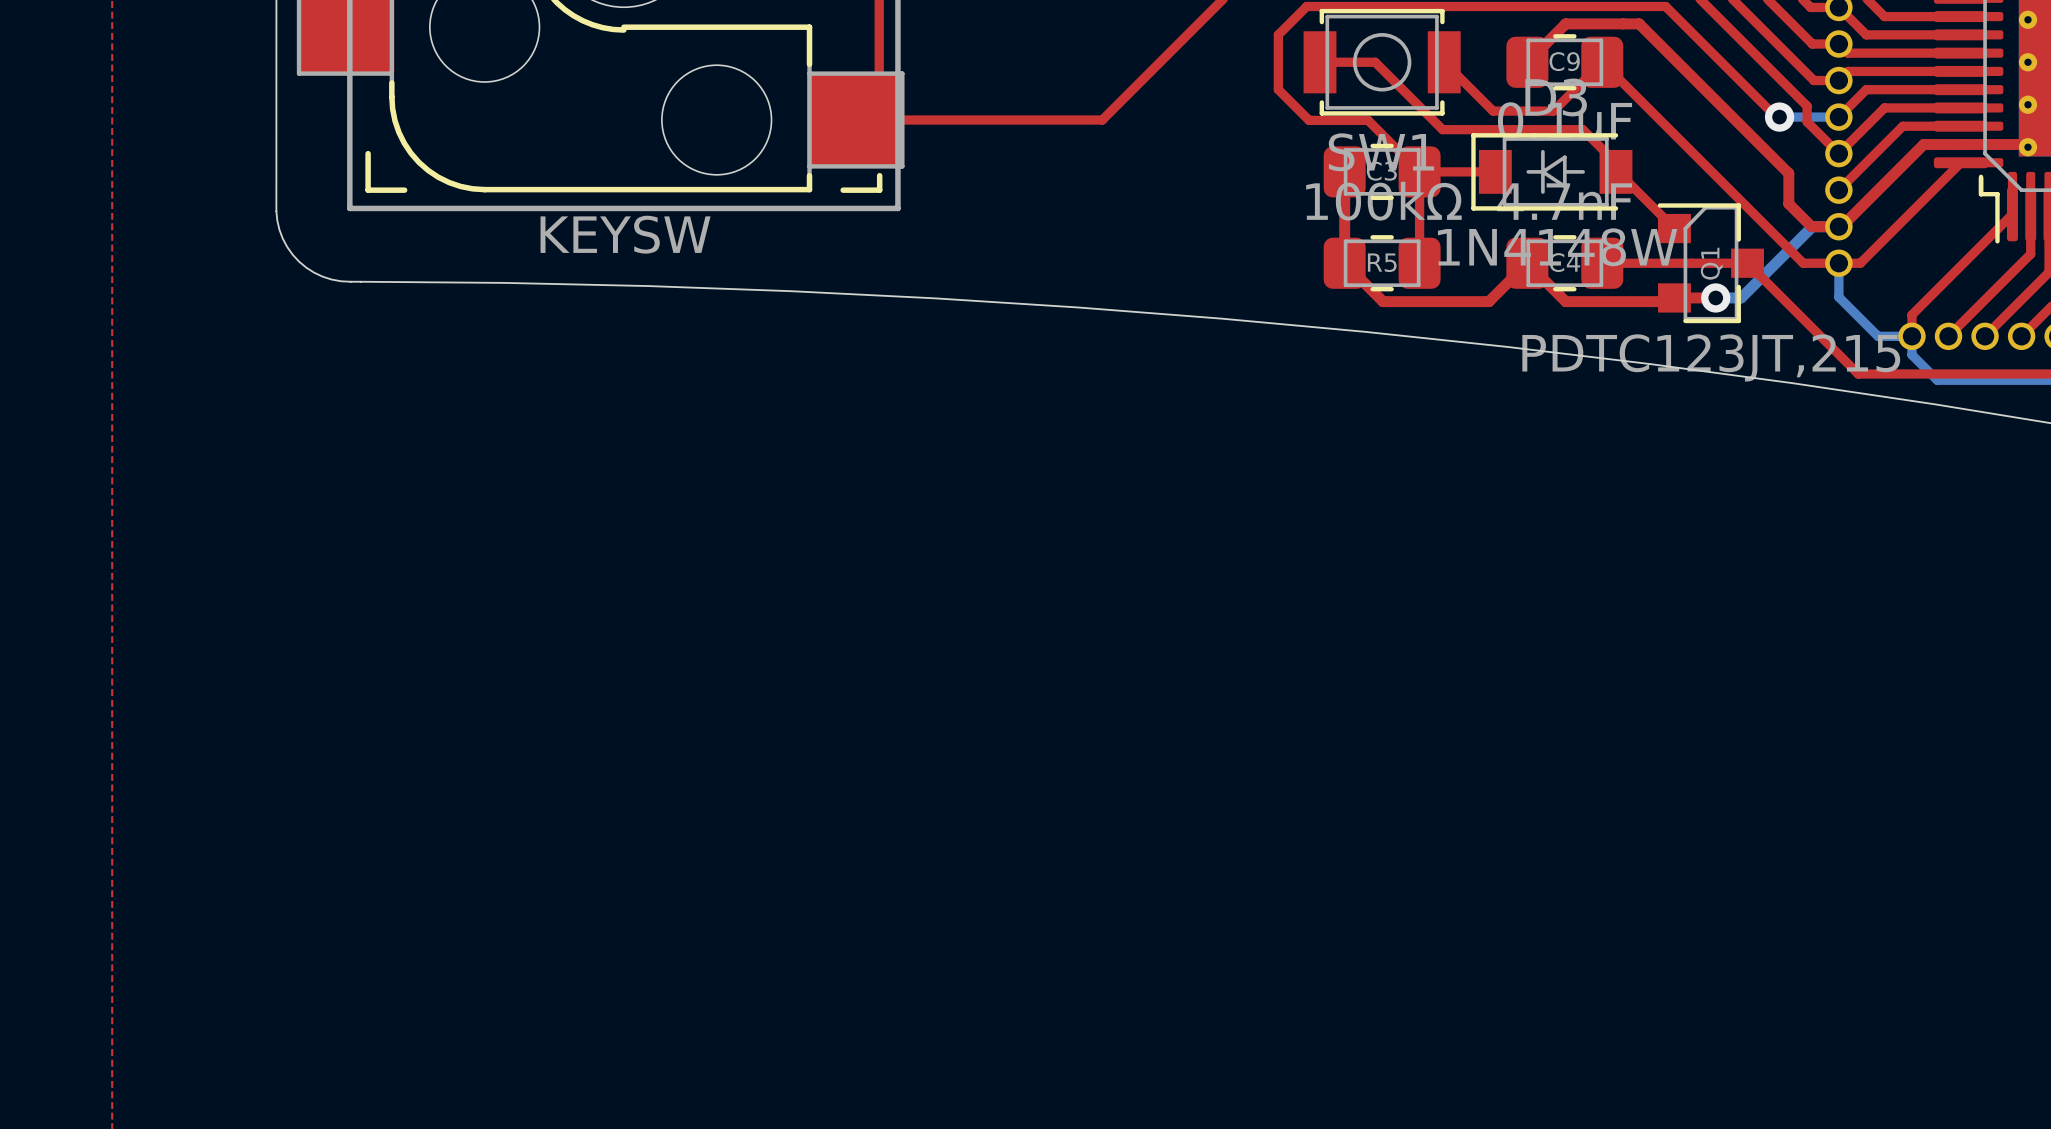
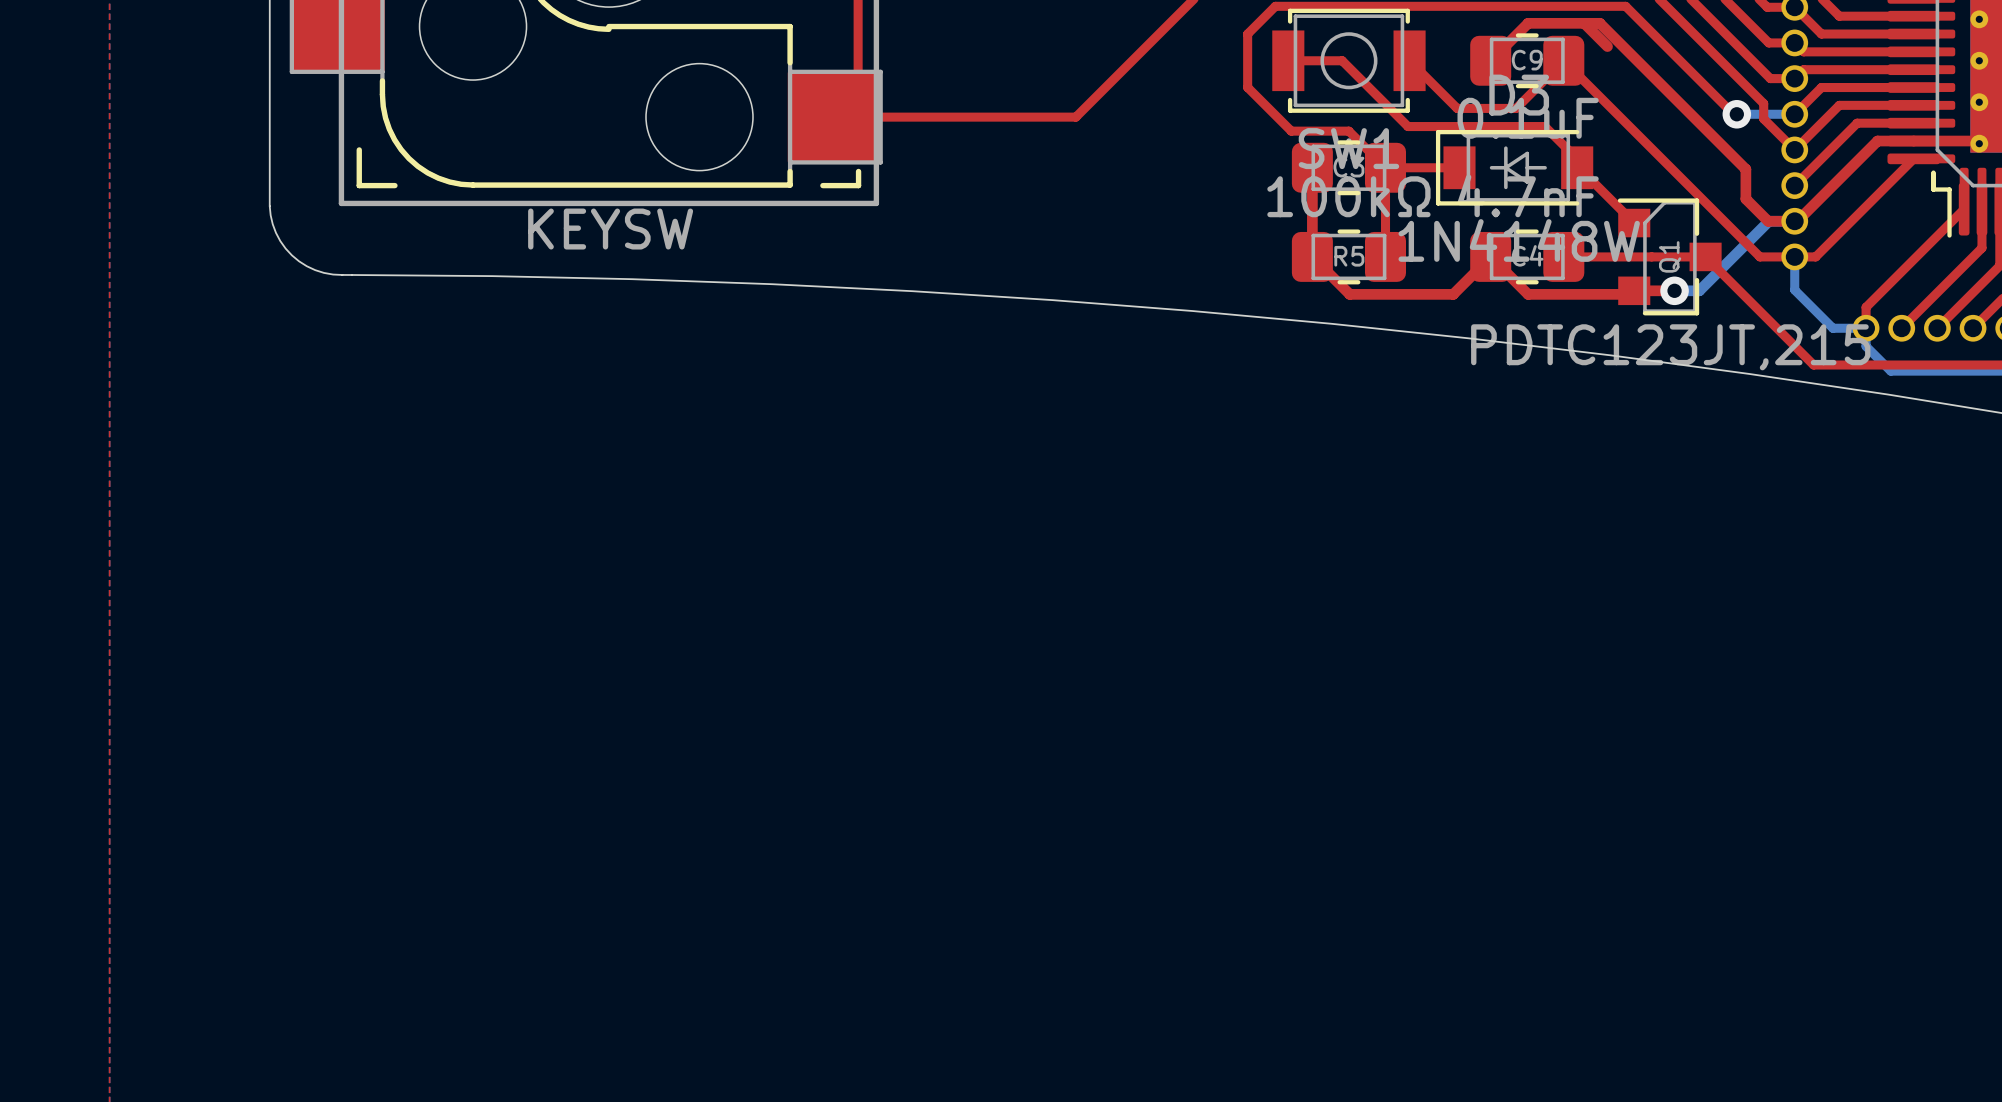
top track: none -> (1584, 23) (1607, 46)
top track: (1309, 120) (1368, 120) (1382, 134) -> (1277, 117) (1291, 131) (1348, 131)

